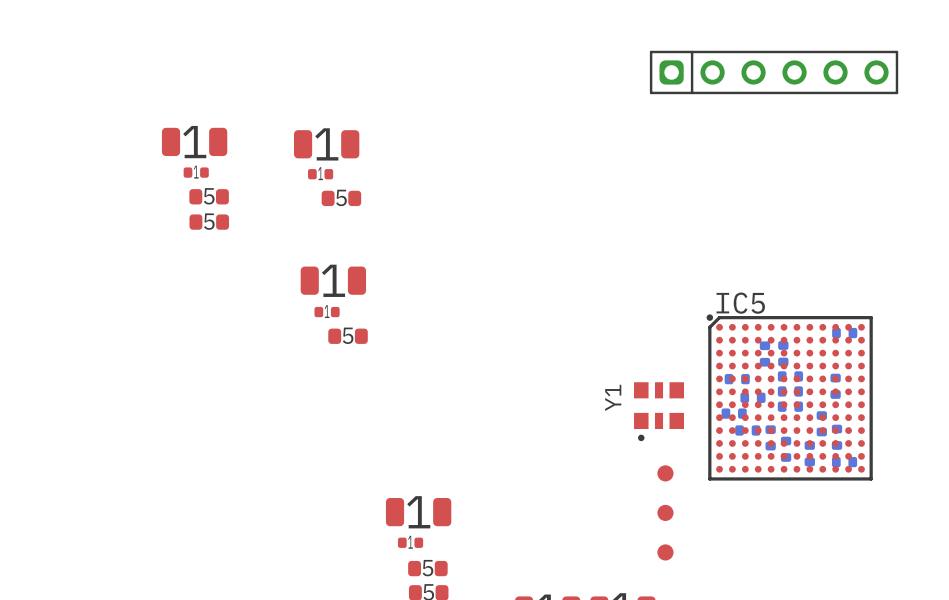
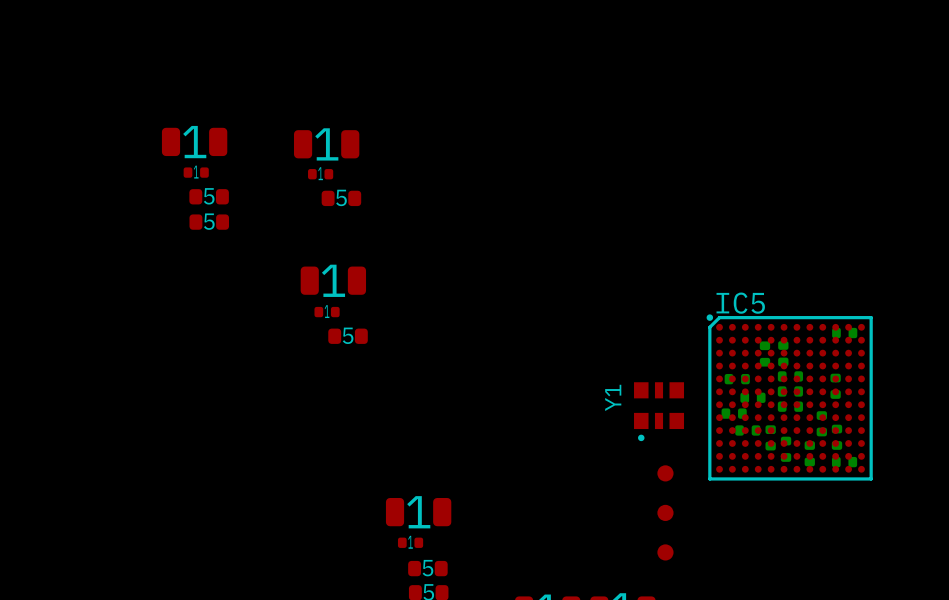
part: (774, 72) -> none

